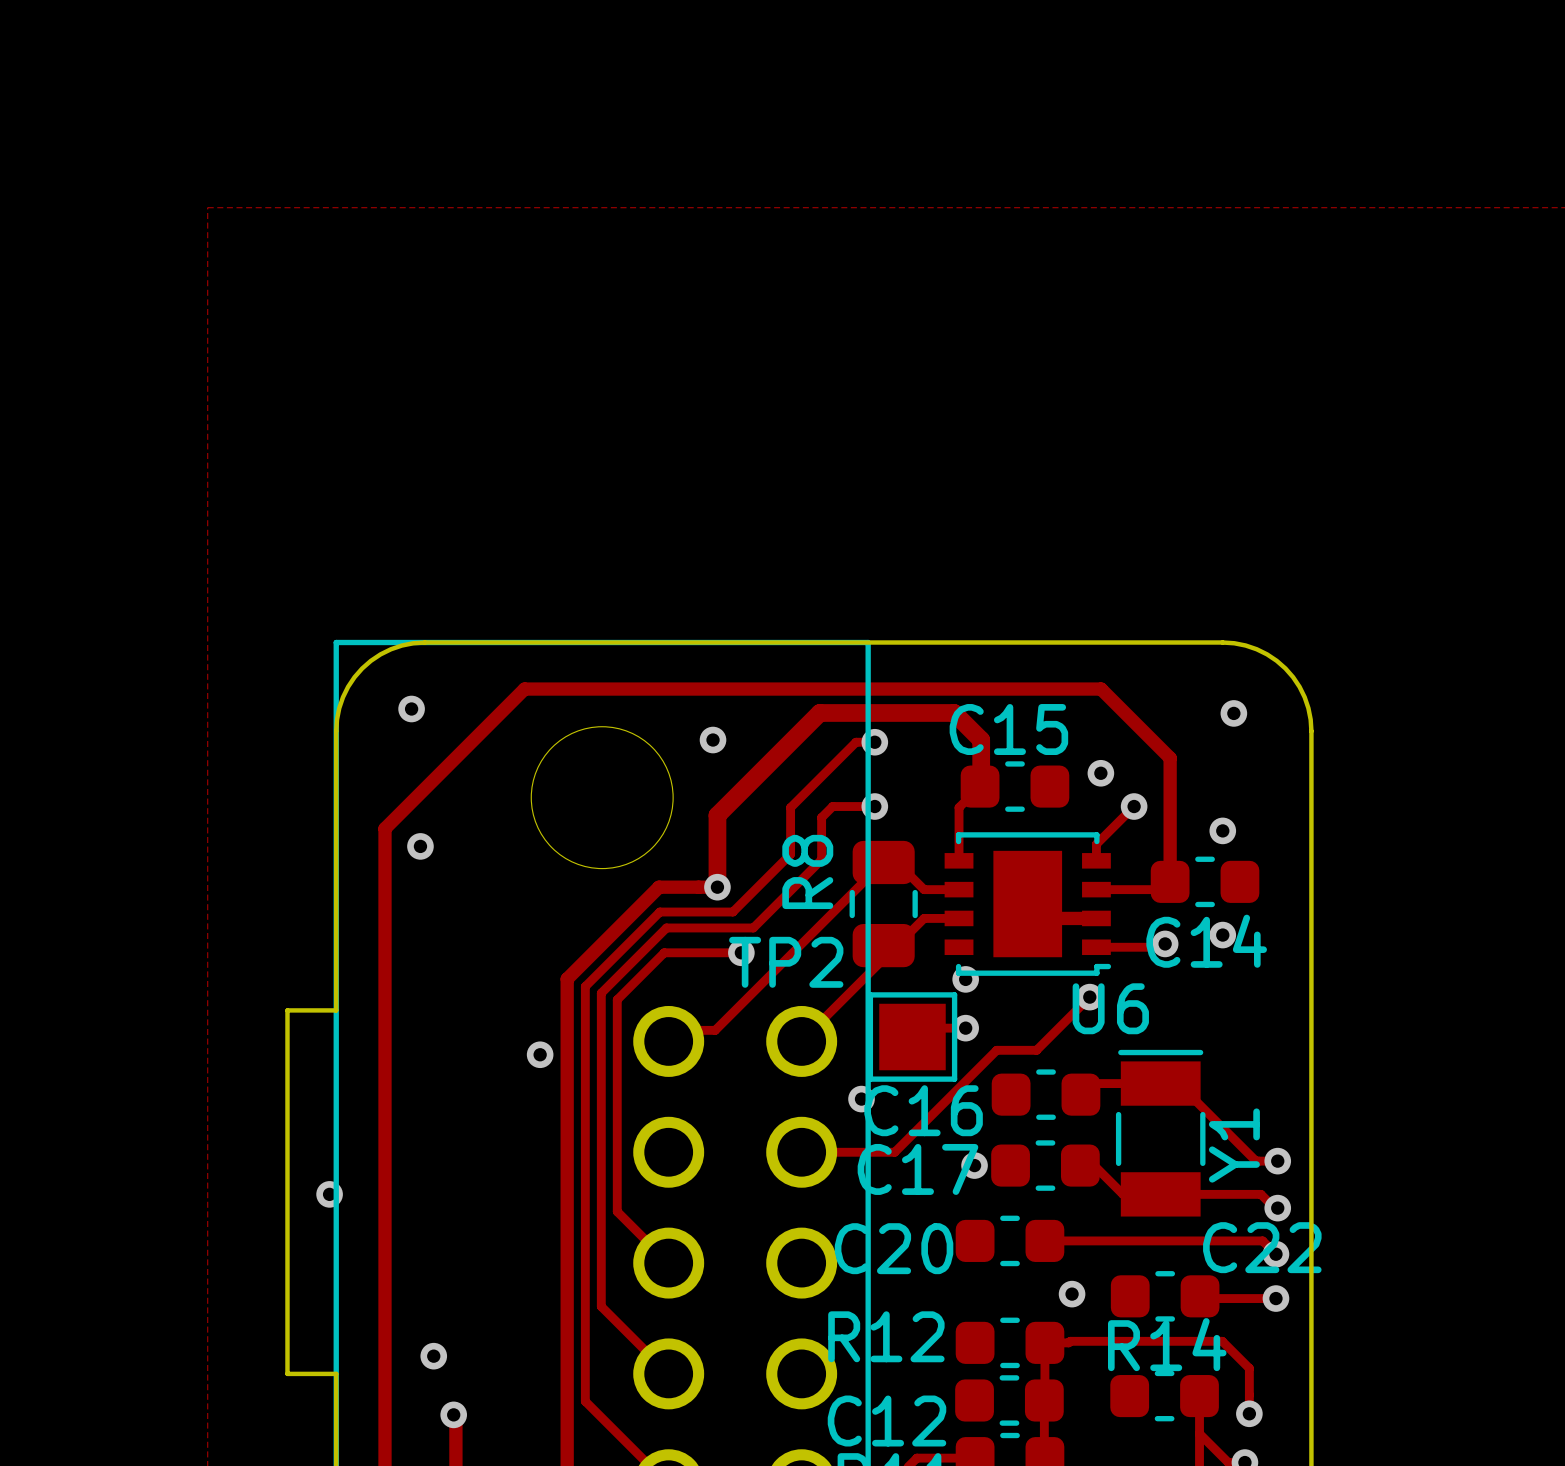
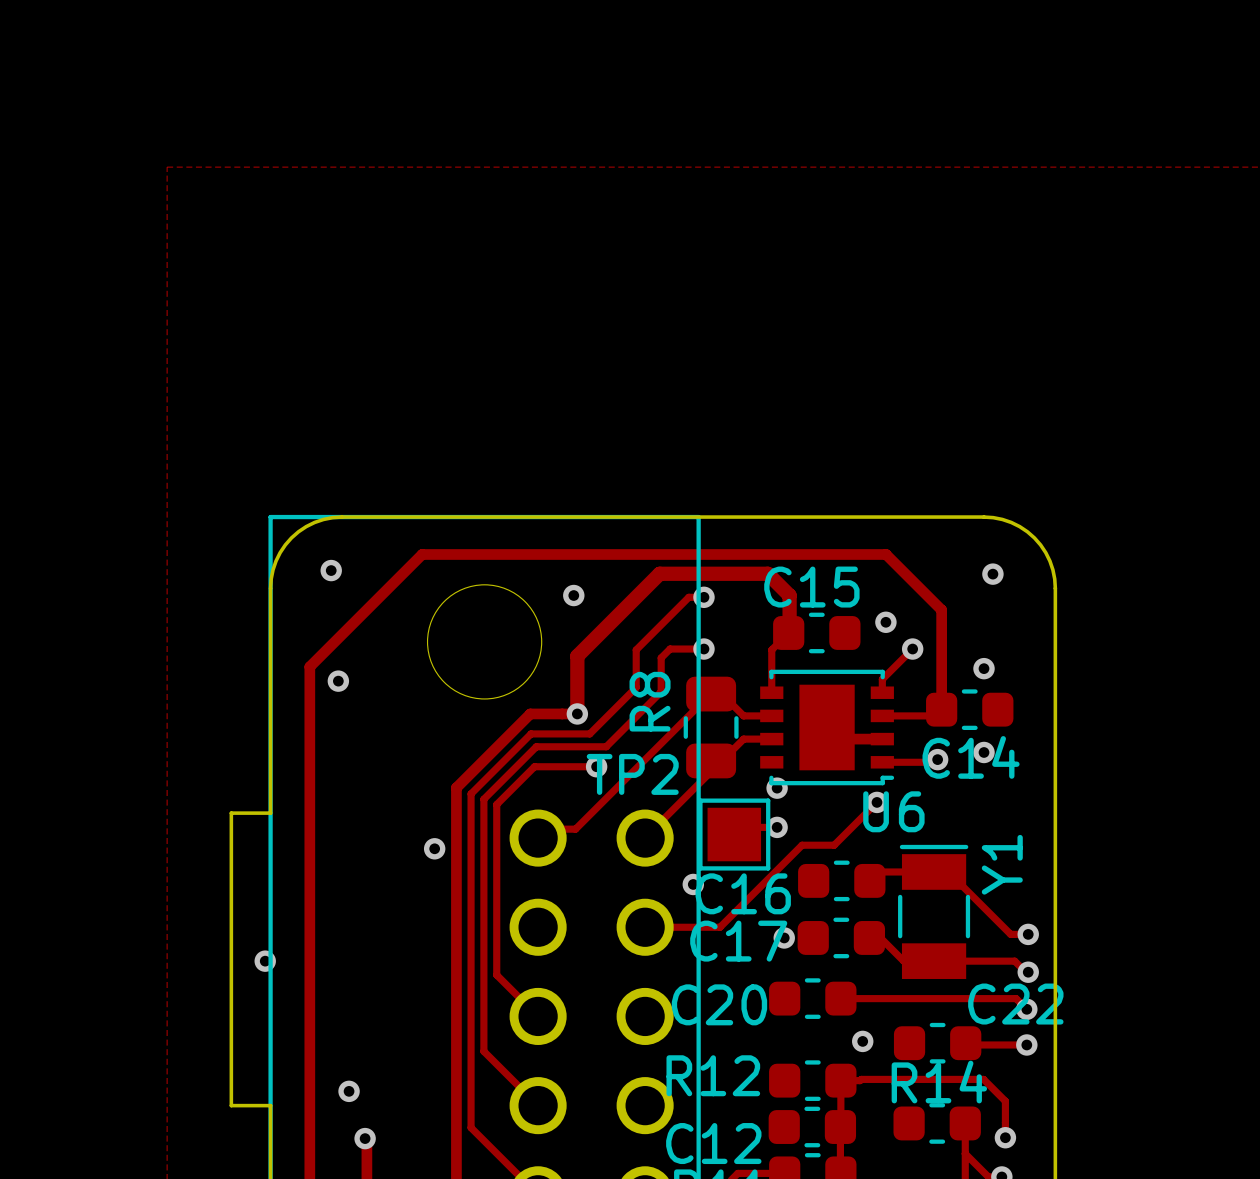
Y1 name position: Y1 (1234, 1145) -> Y1 (1002, 864)

